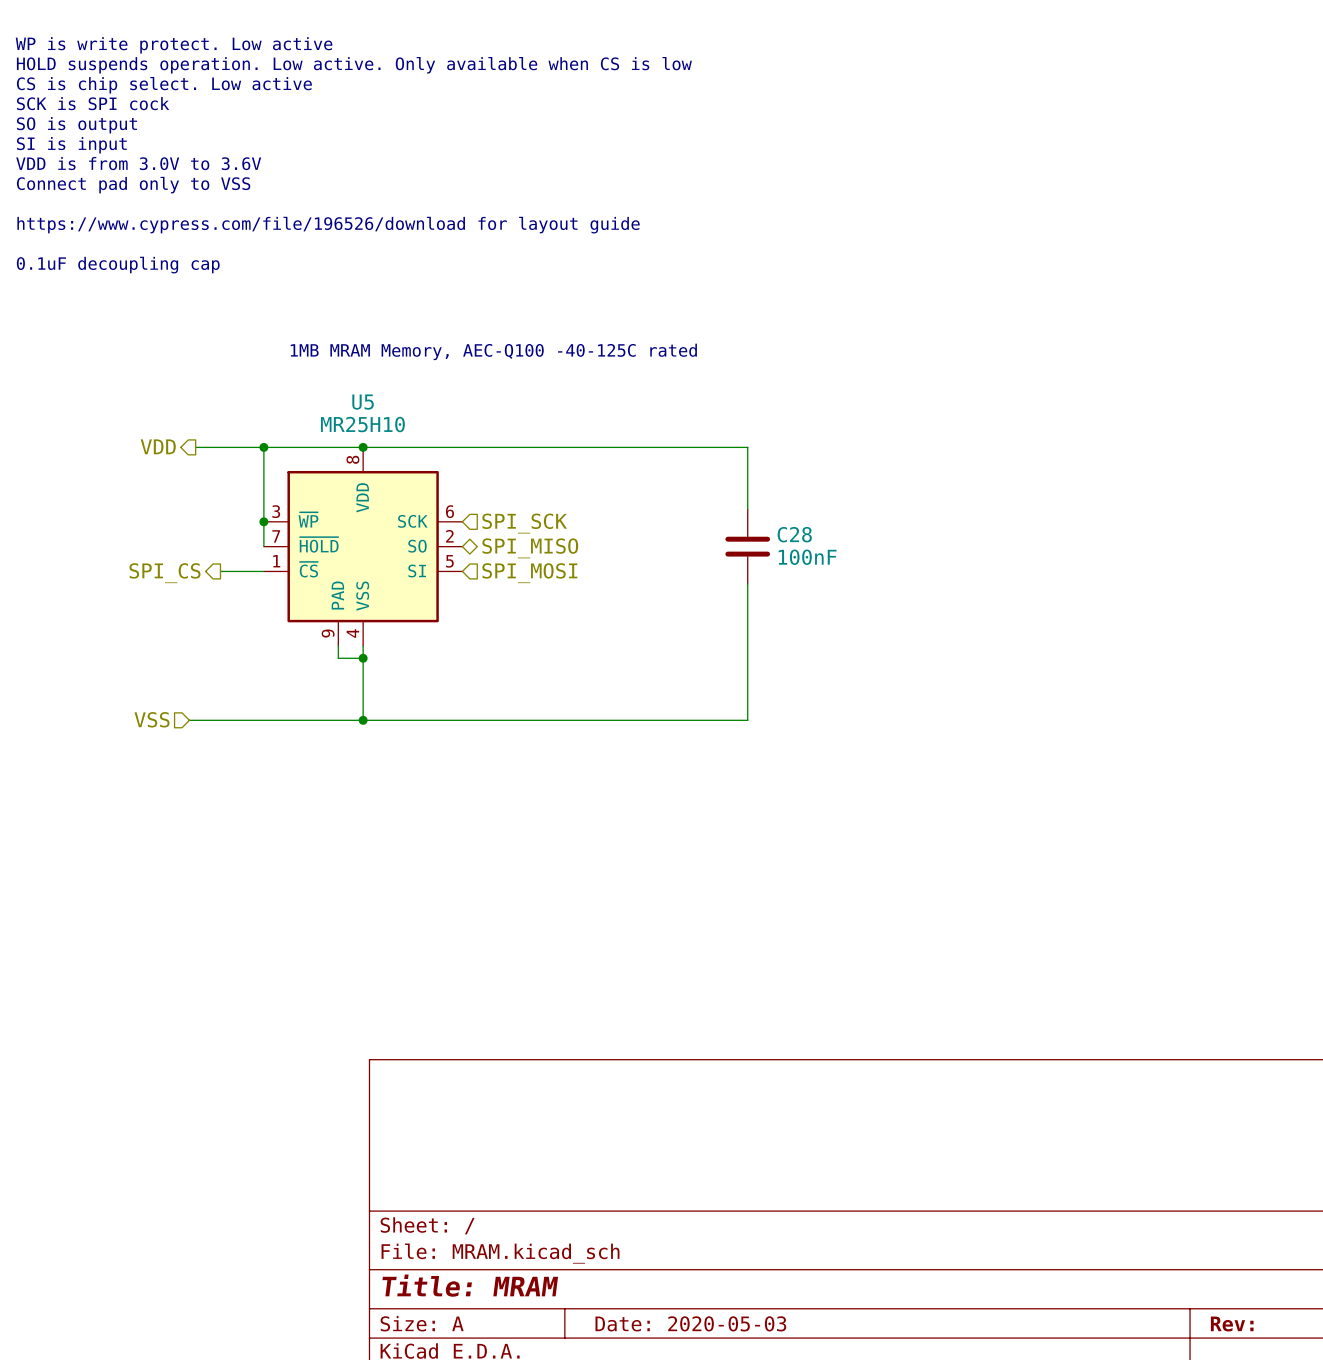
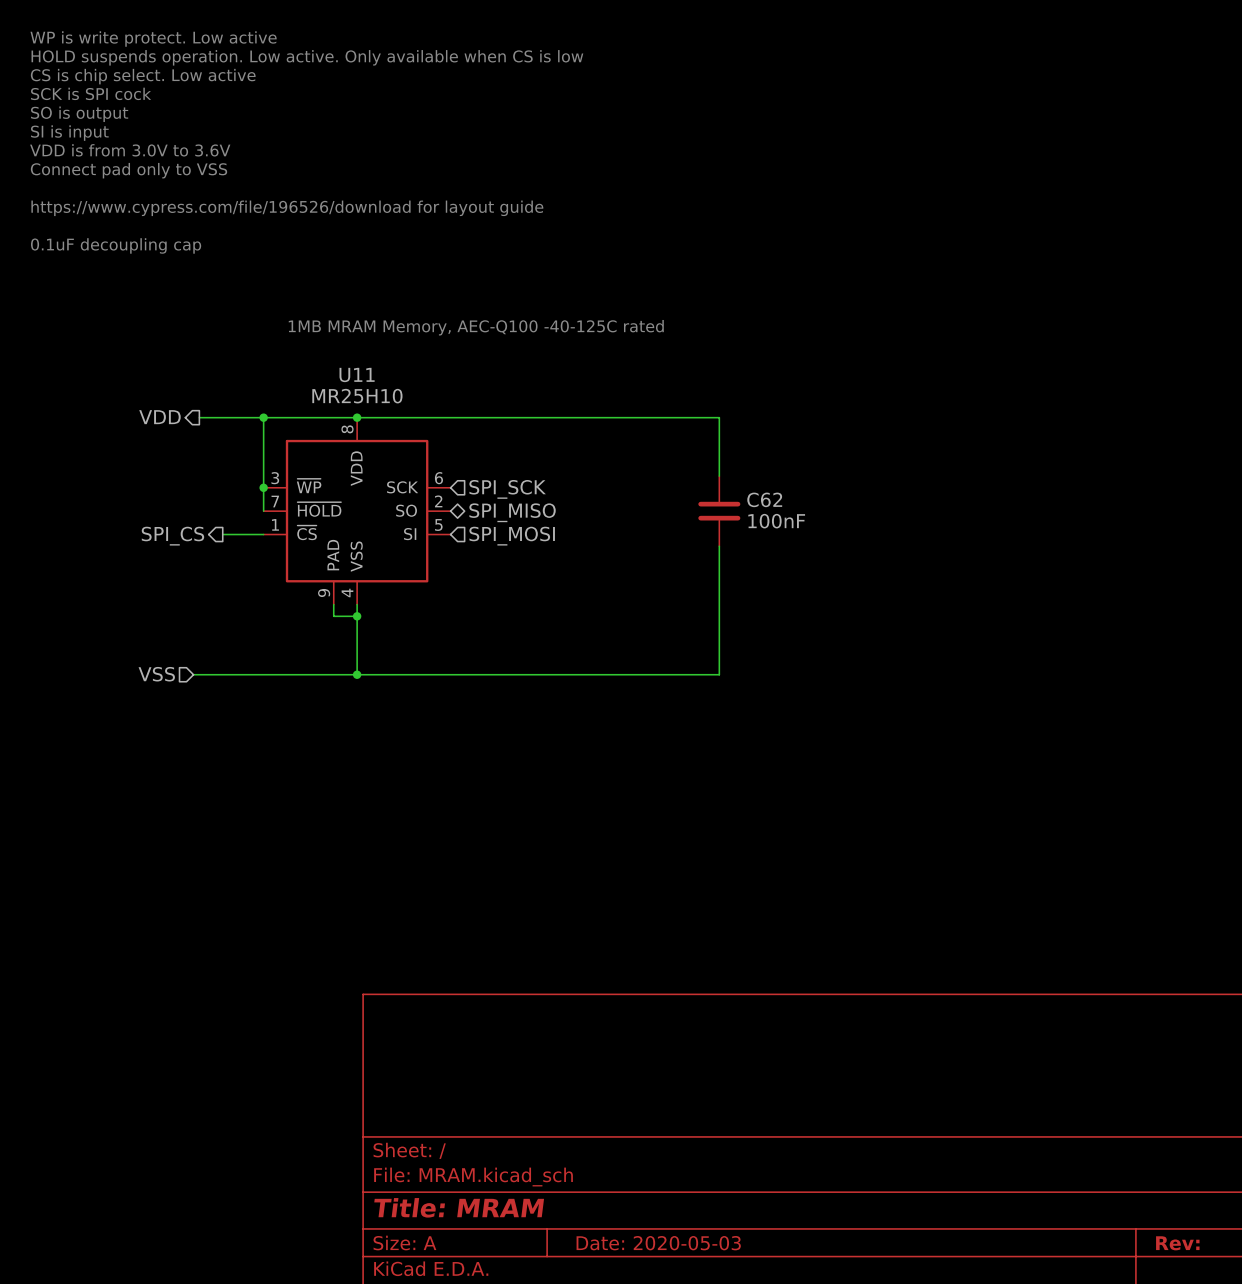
U5 name: U5 (363, 402) -> U11 (357, 374)
C28 name: C28 (794, 534) -> C62 (764, 499)

